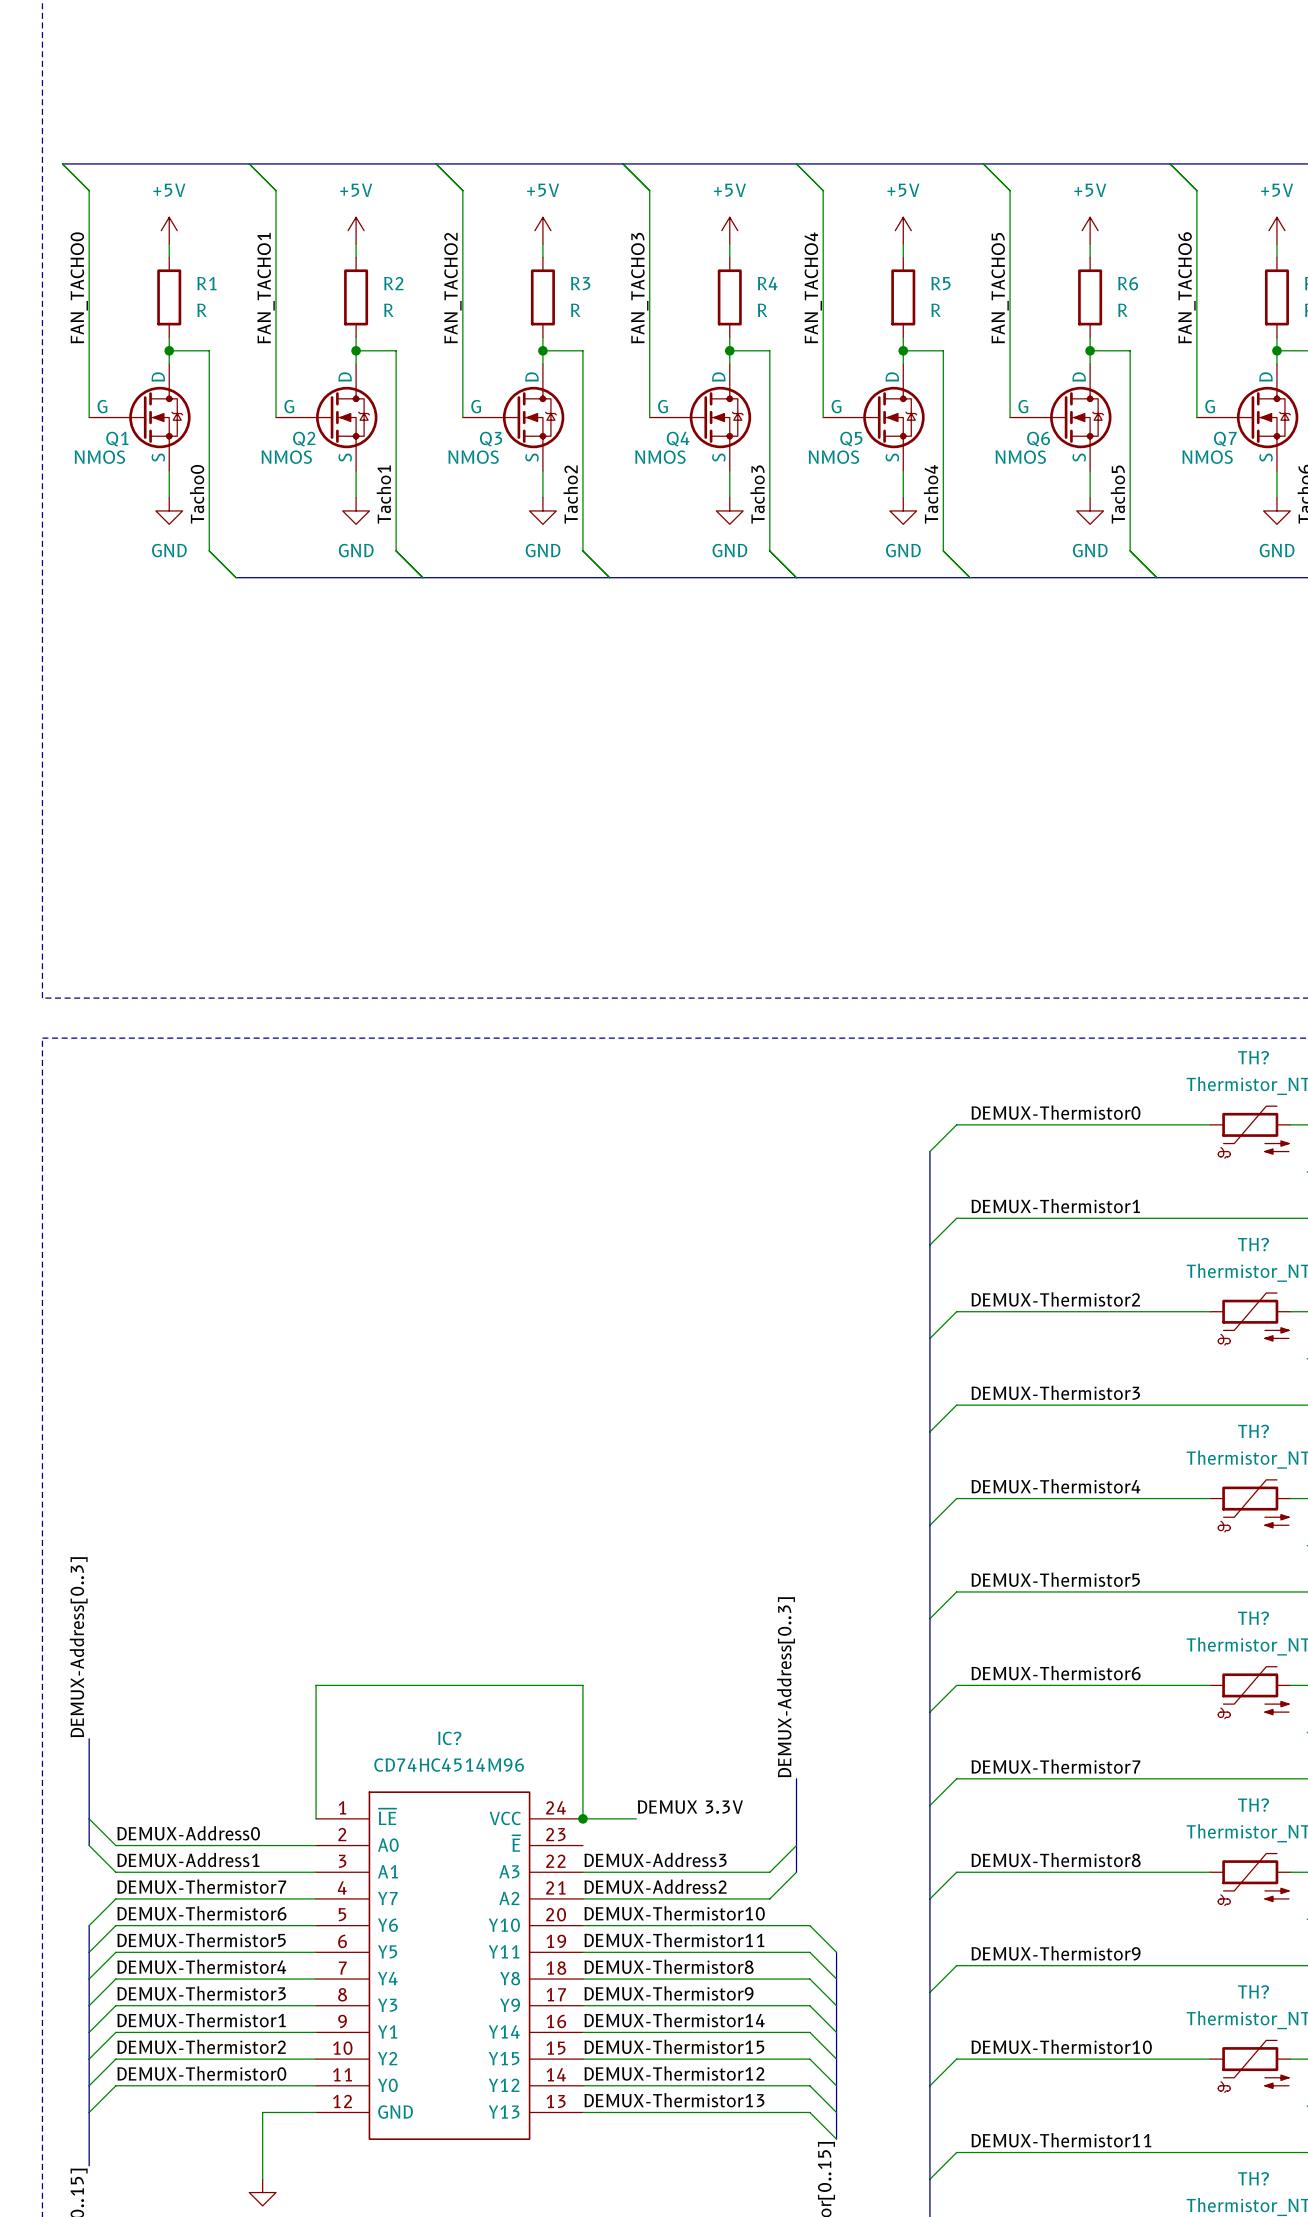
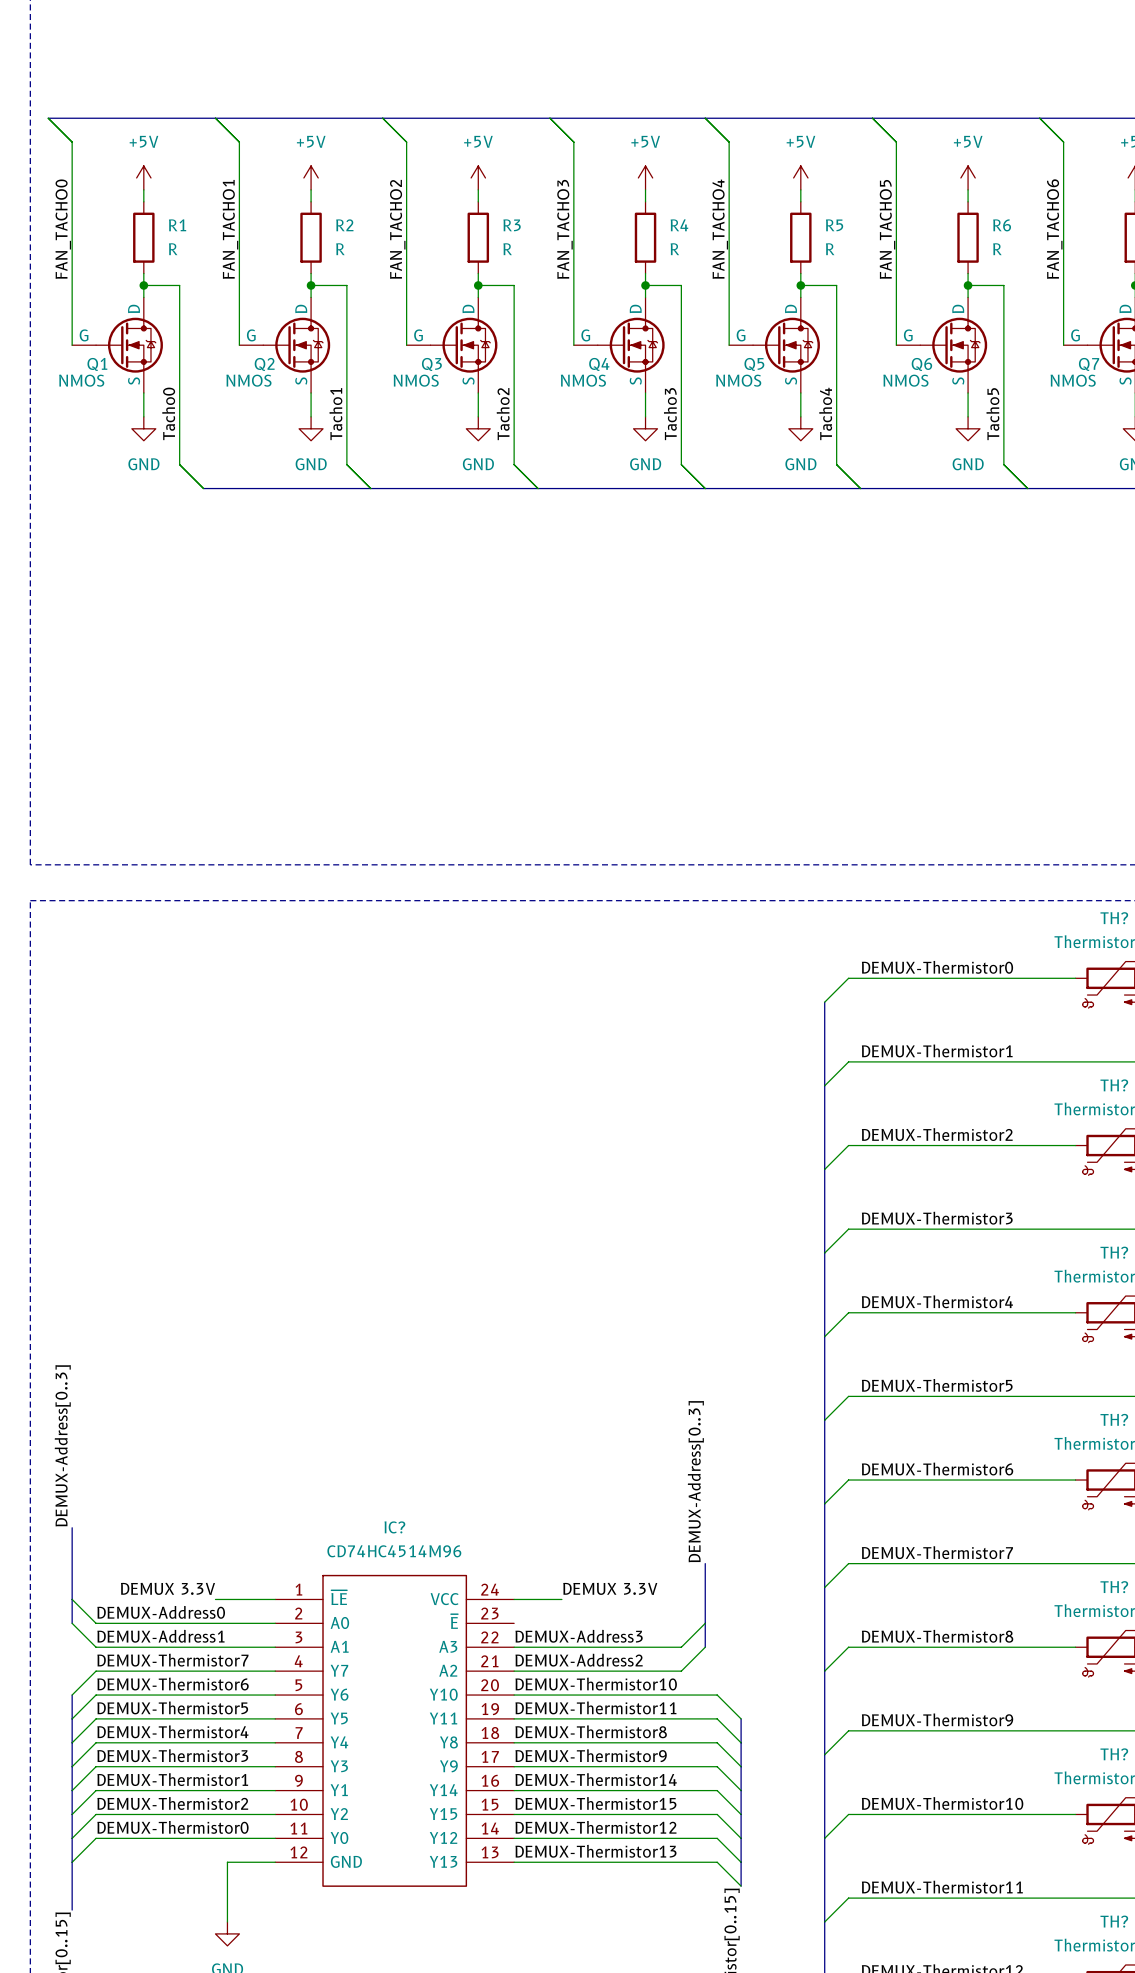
label: none -> DEMUX 3.3V (167, 1588)
wire: (316, 1818) (316, 1685) (582, 1685) (582, 1818) -> (275, 1599) (215, 1599)
junction: (582, 1818) -> none

